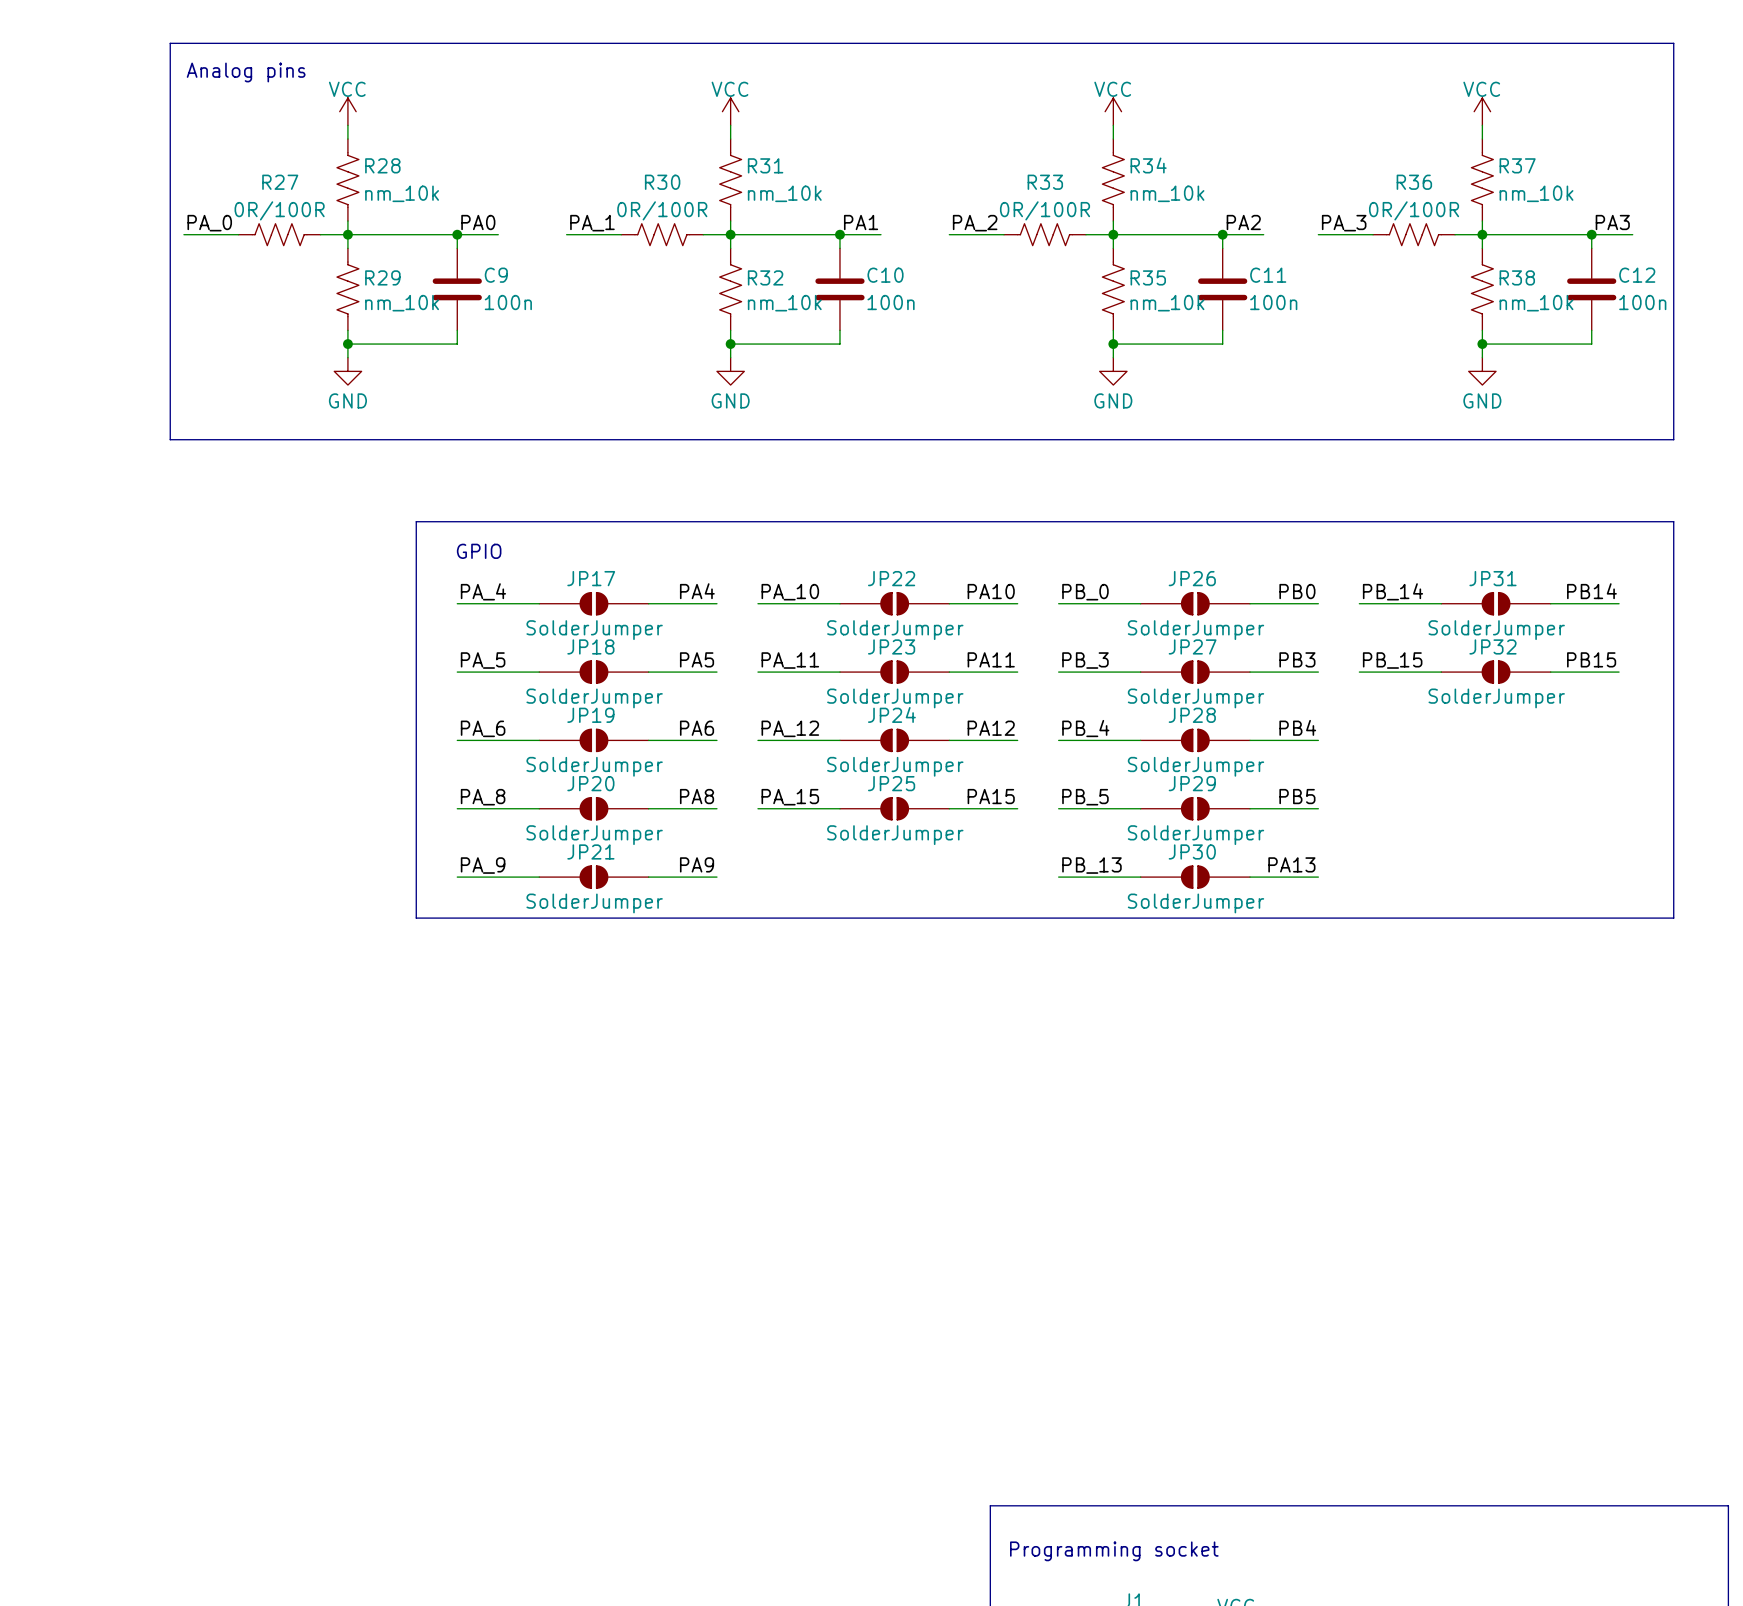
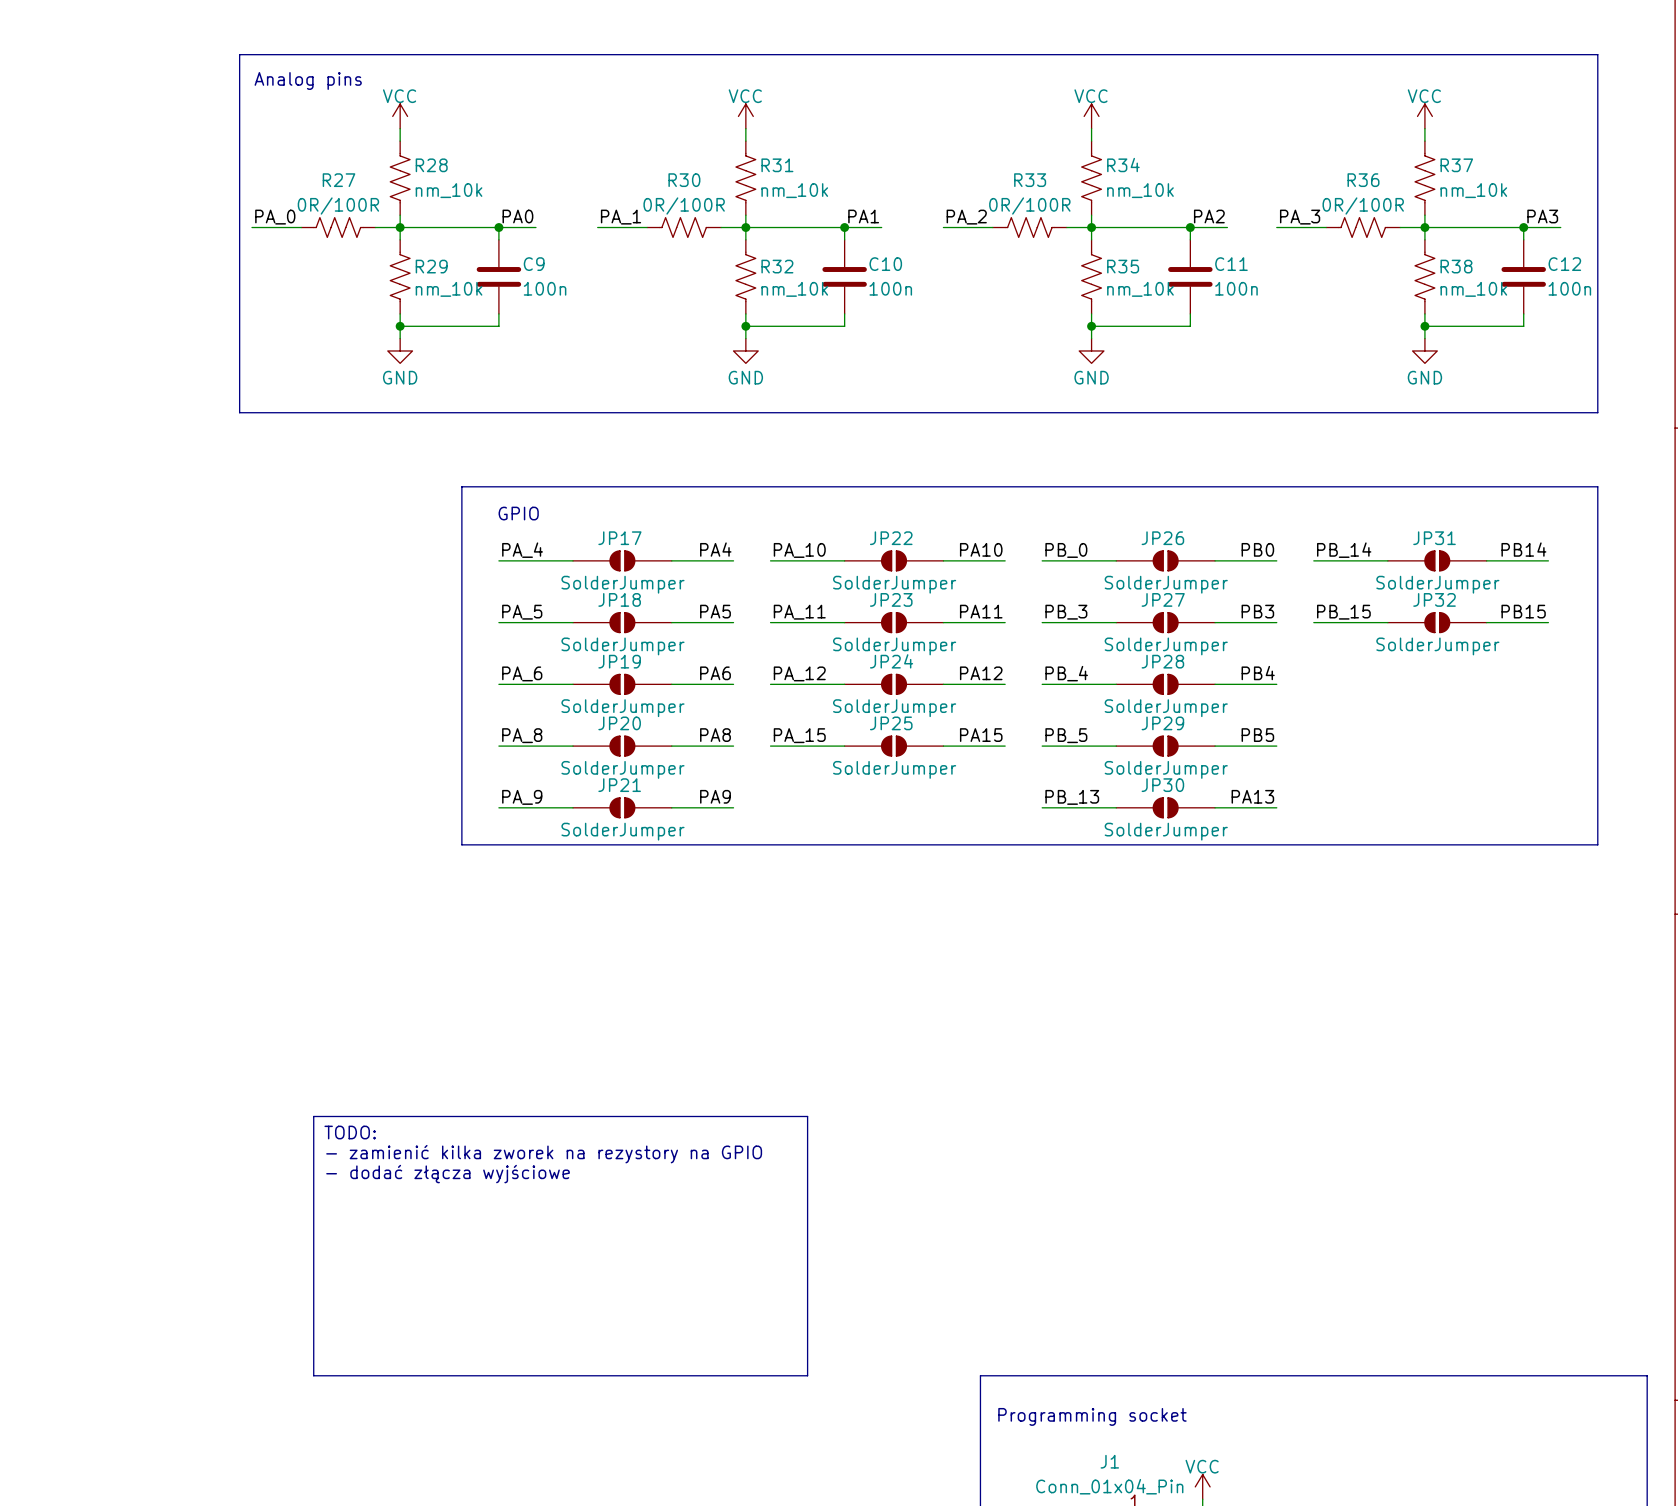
line: none -> (313, 1116) (807, 1116) (807, 1375) (313, 1375) (313, 1116)
text: none -> TODO: (350, 1132)
text: none -> - zamienić kilka zworek na rezystory na GPIO (544, 1154)
text: none -> - dodać złącza wyjściowe (448, 1174)

